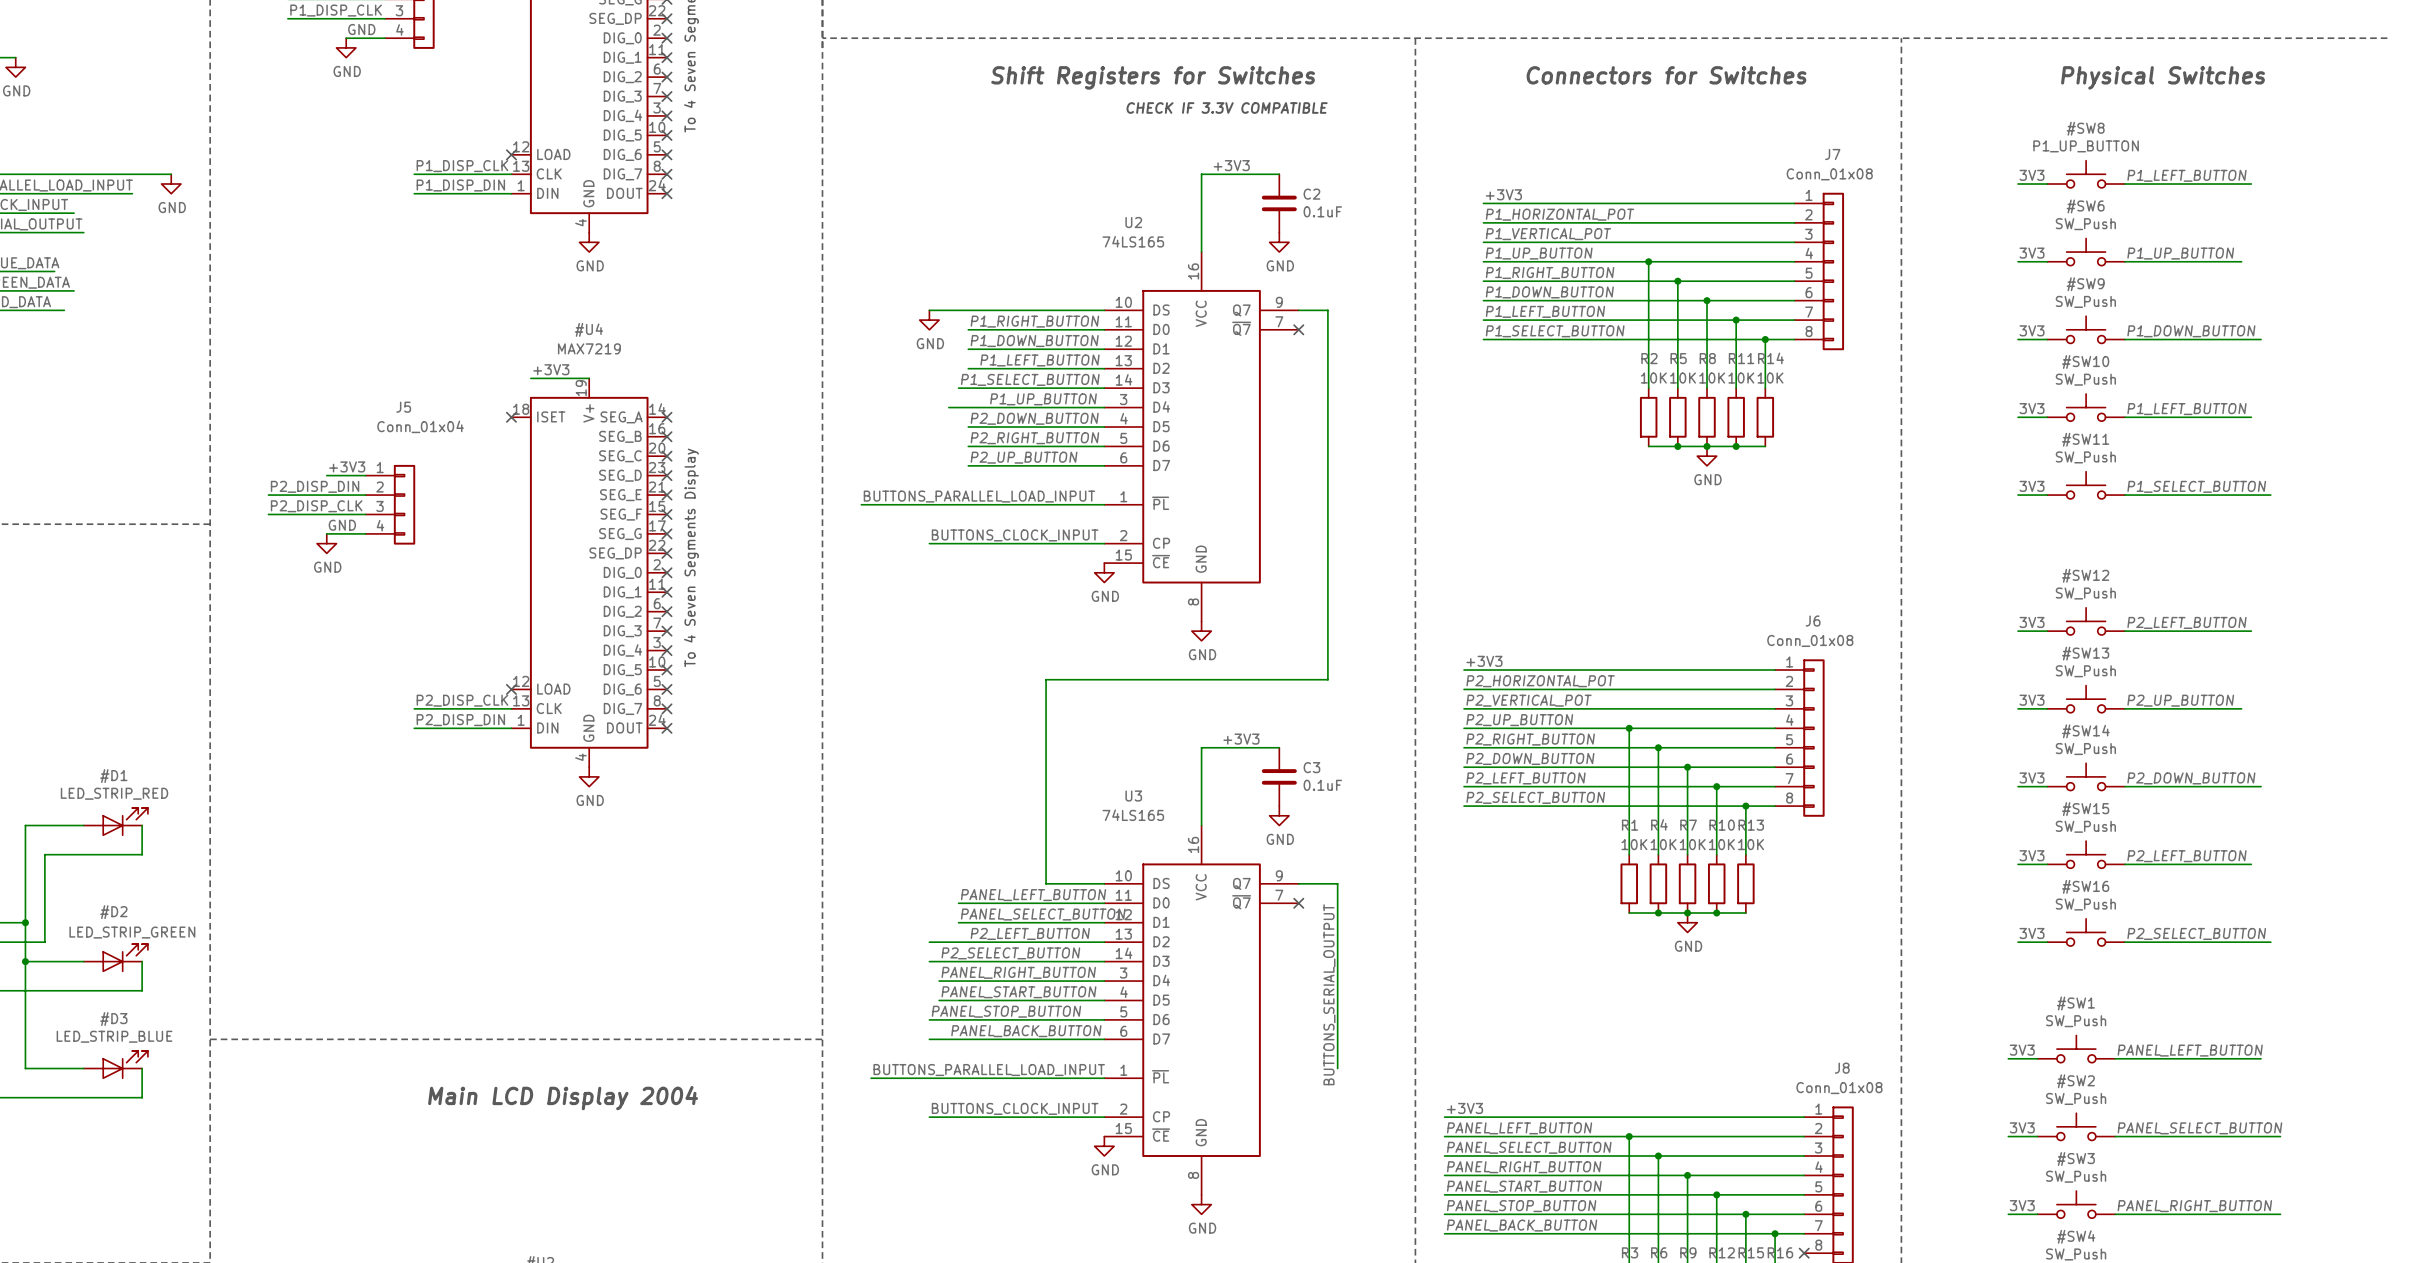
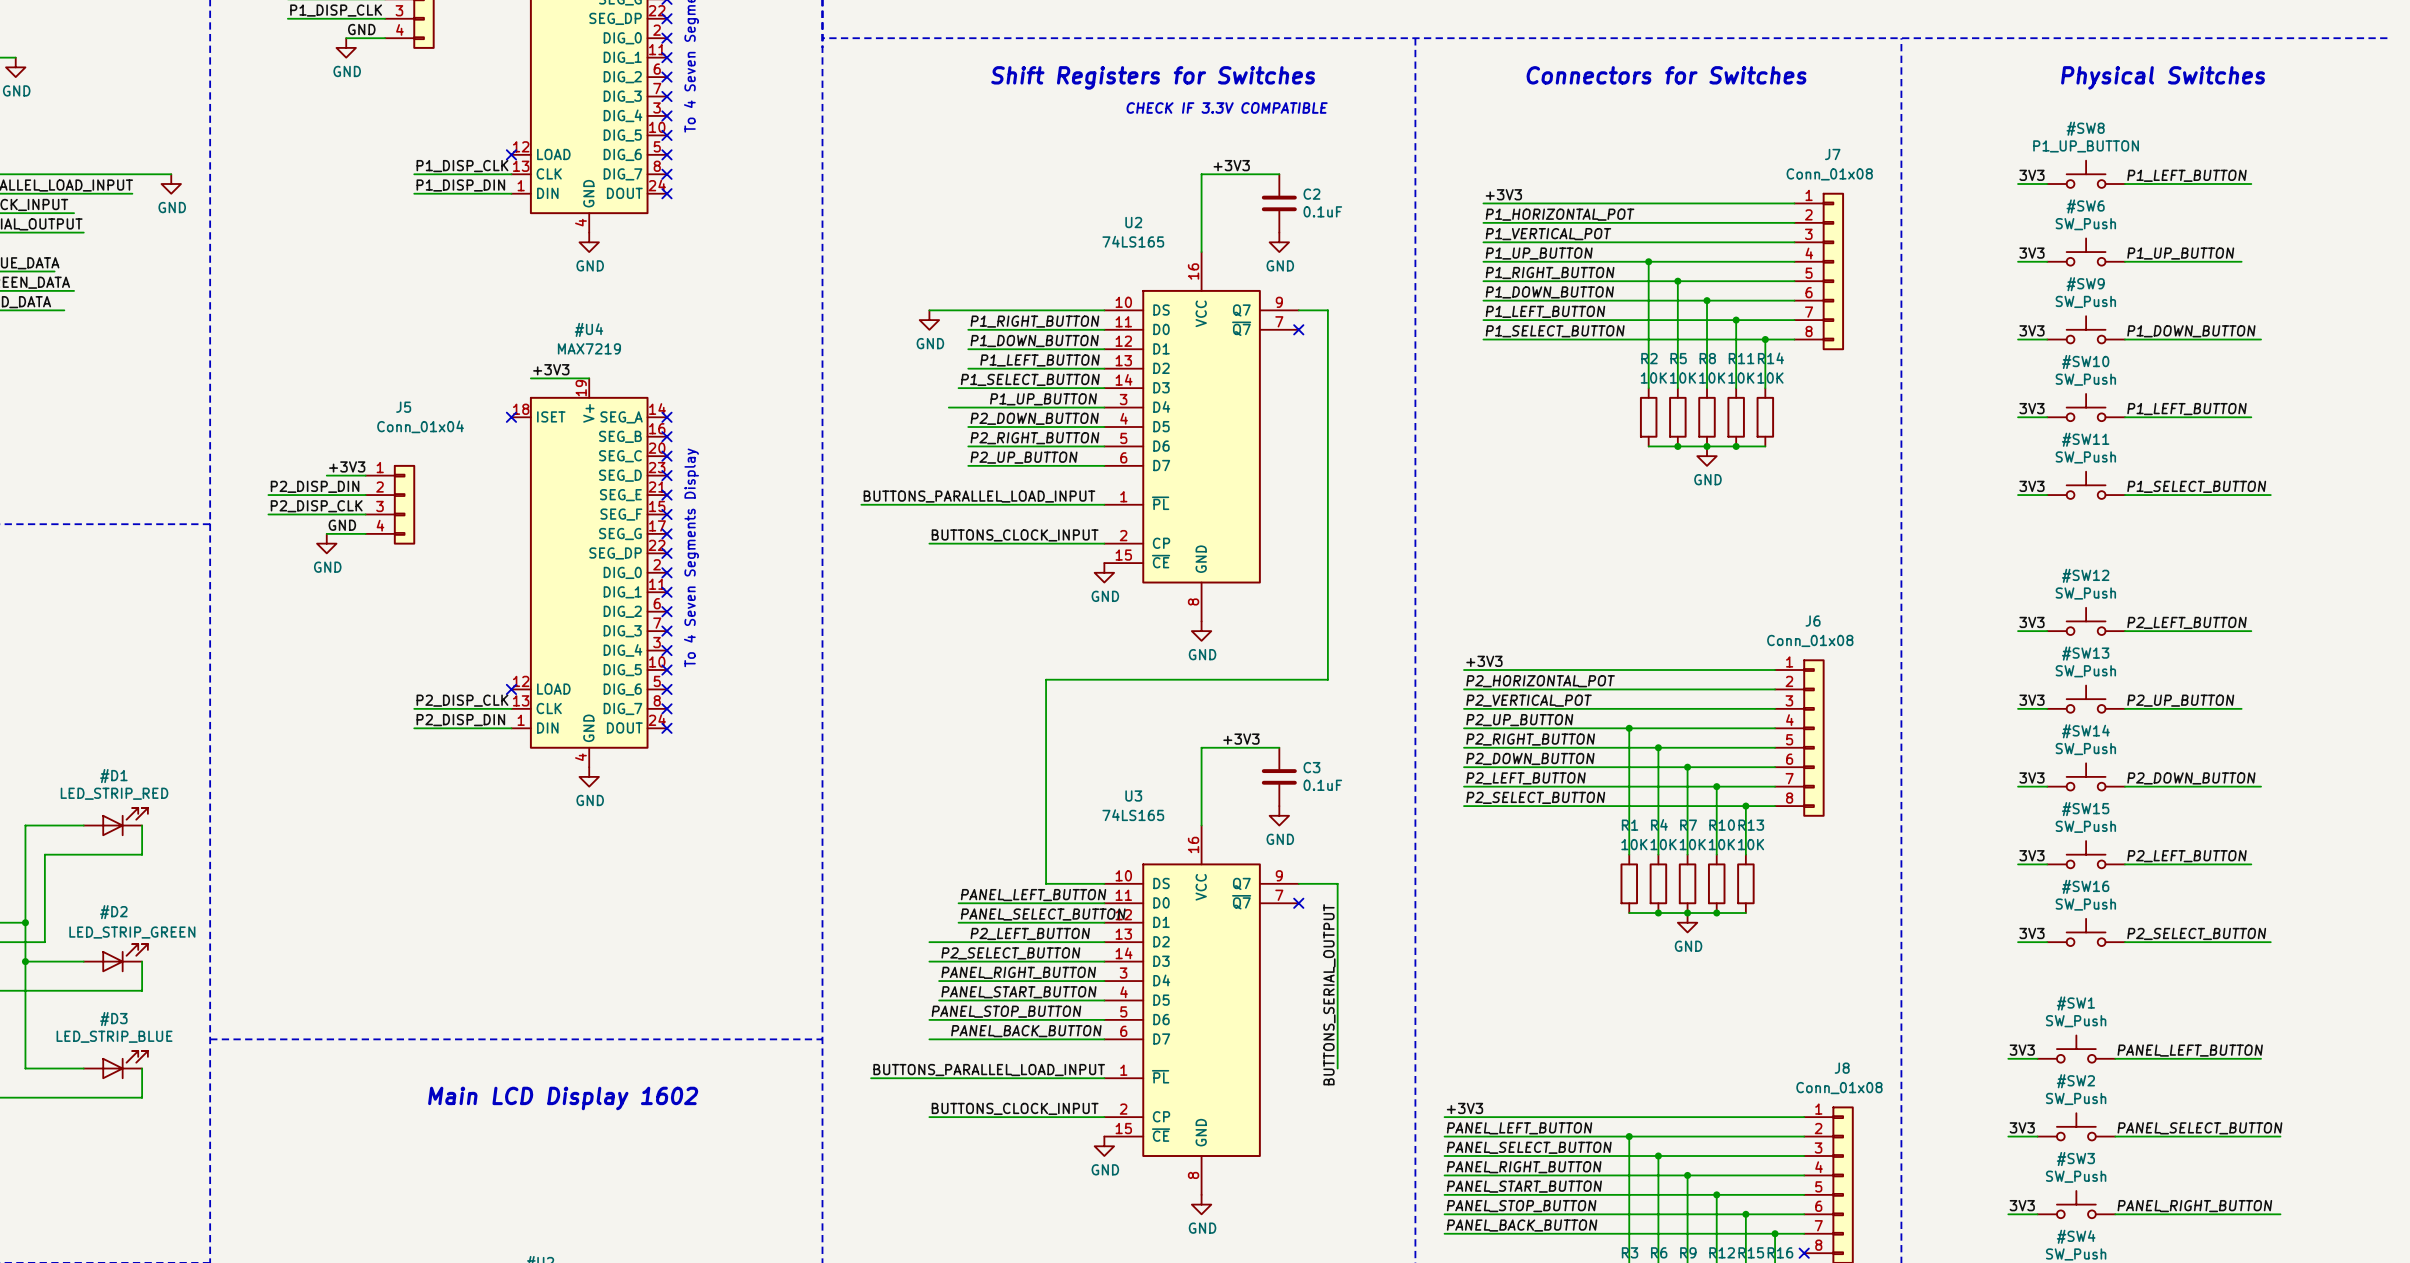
text: Main LCD Display 2004 (563, 1098) -> Main LCD Display 1602 (563, 1098)

